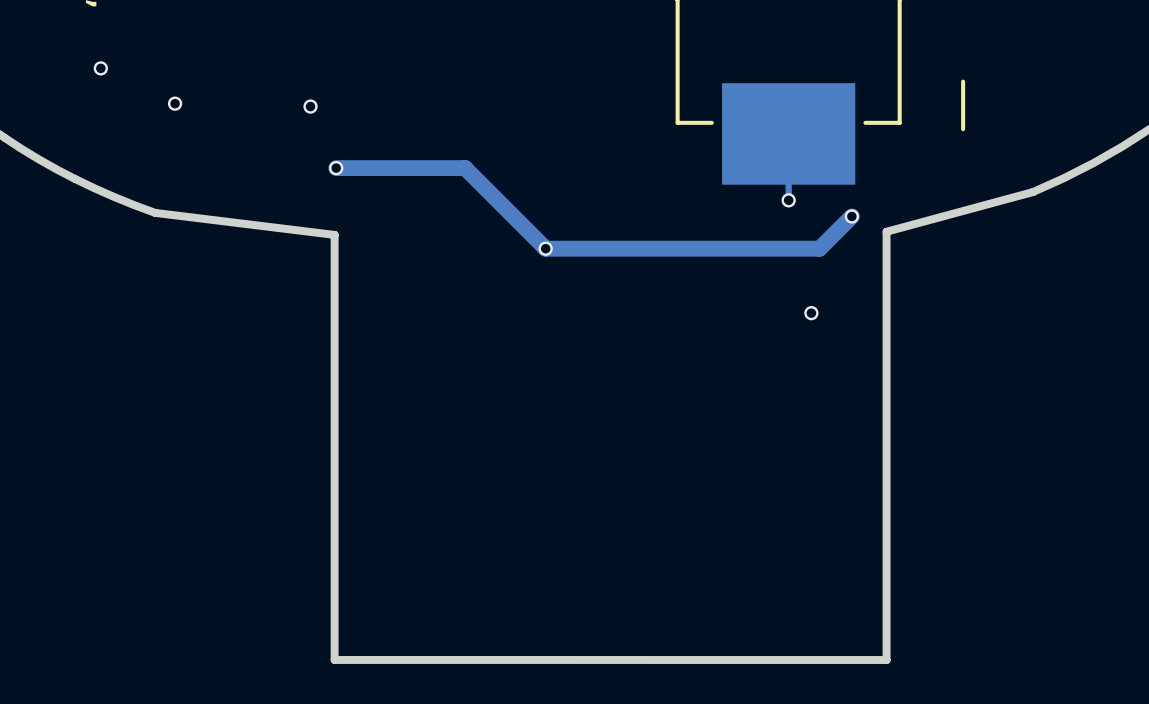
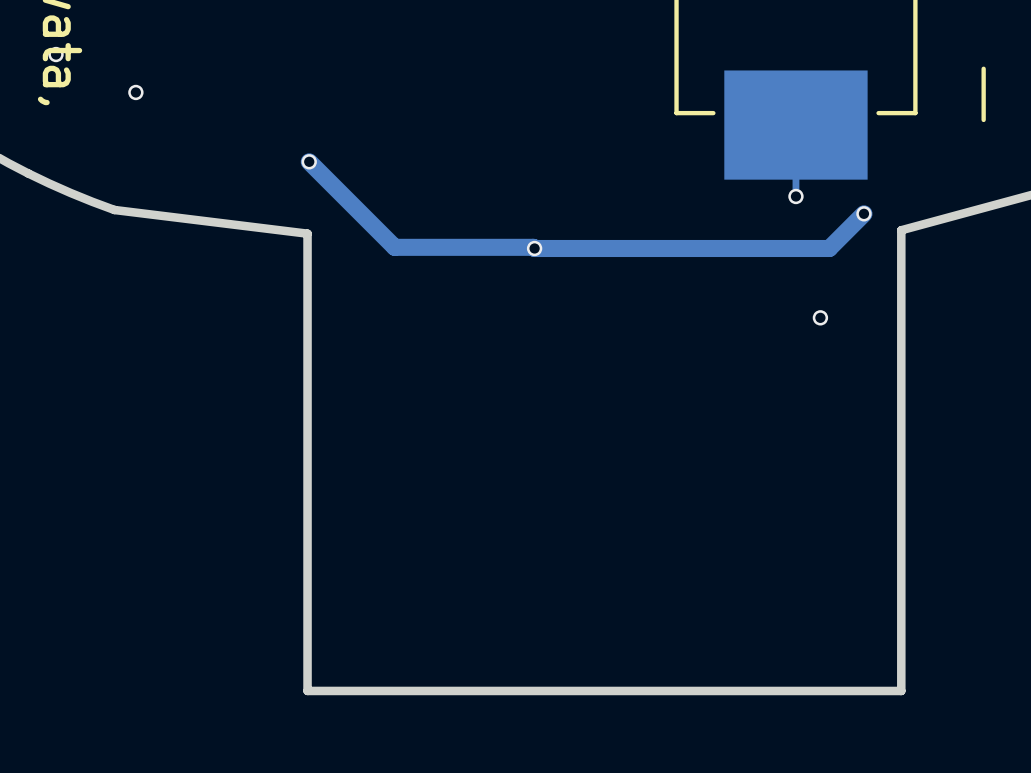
via: (310, 106) -> none
track: (336, 168) (465, 168) (544, 247) -> (309, 161) (394, 247) (533, 247)

